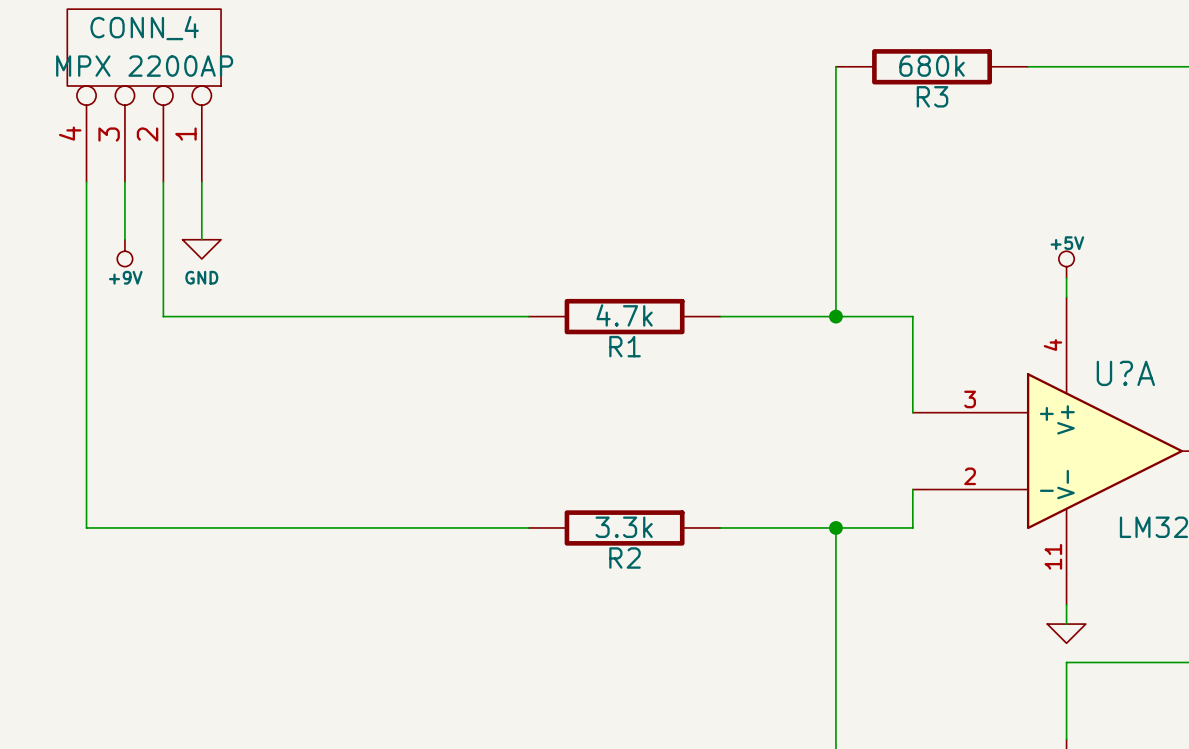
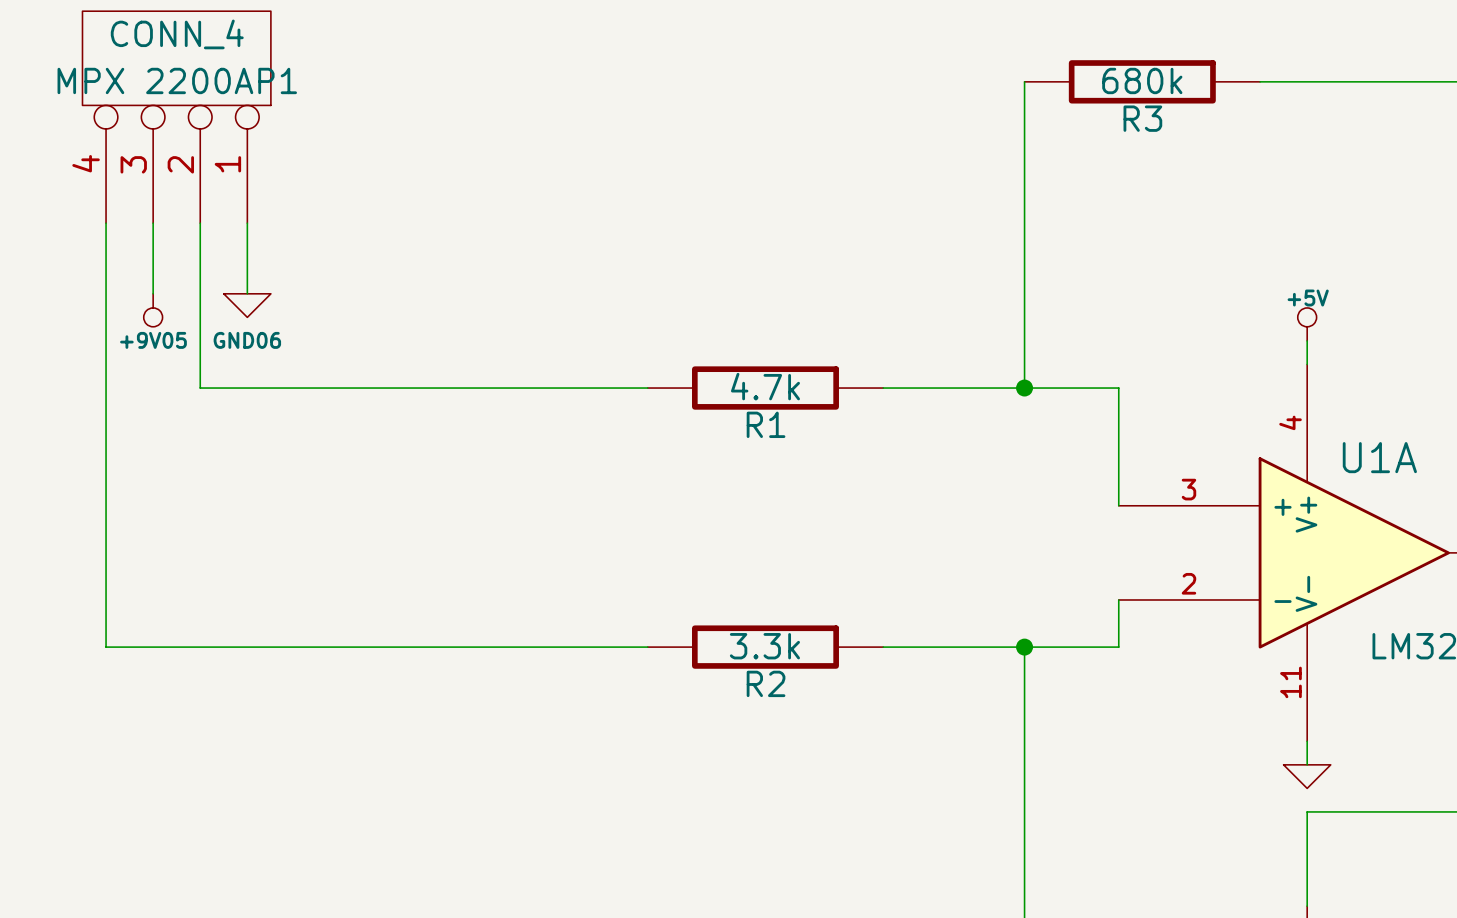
MPX 2200AP name: MPX 2200AP (144, 66) -> MPX 2200AP1 (177, 80)
+9V name: +9V (125, 277) -> +9V05 (153, 340)
GND name: GND (201, 277) -> GND06 (247, 340)
U?A name: U?A (1125, 373) -> U1A (1379, 457)

